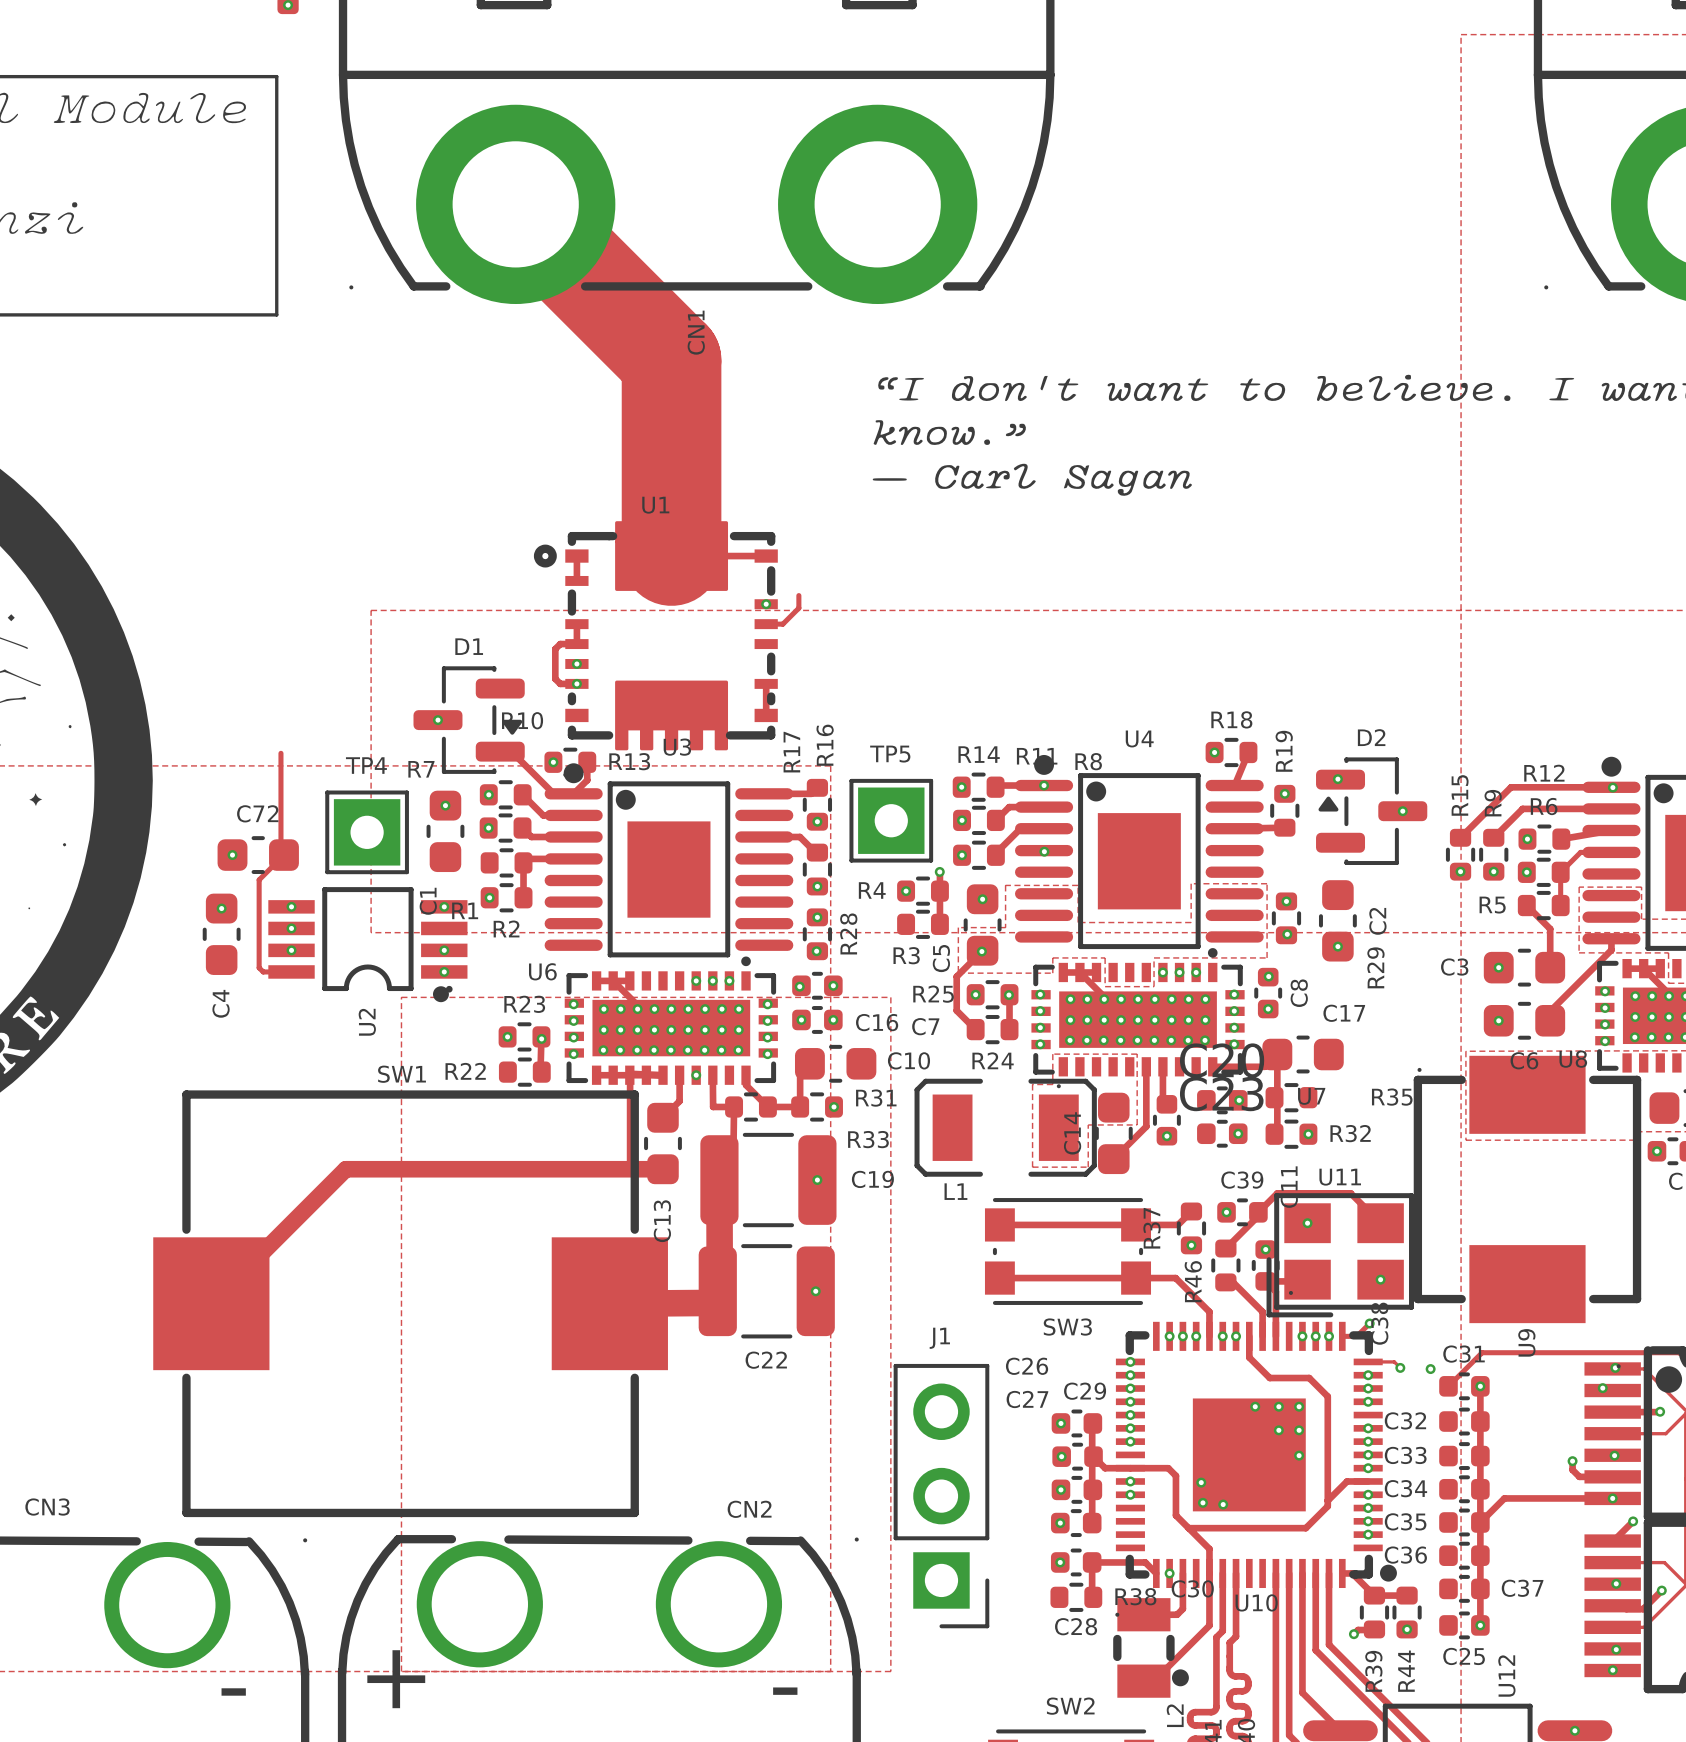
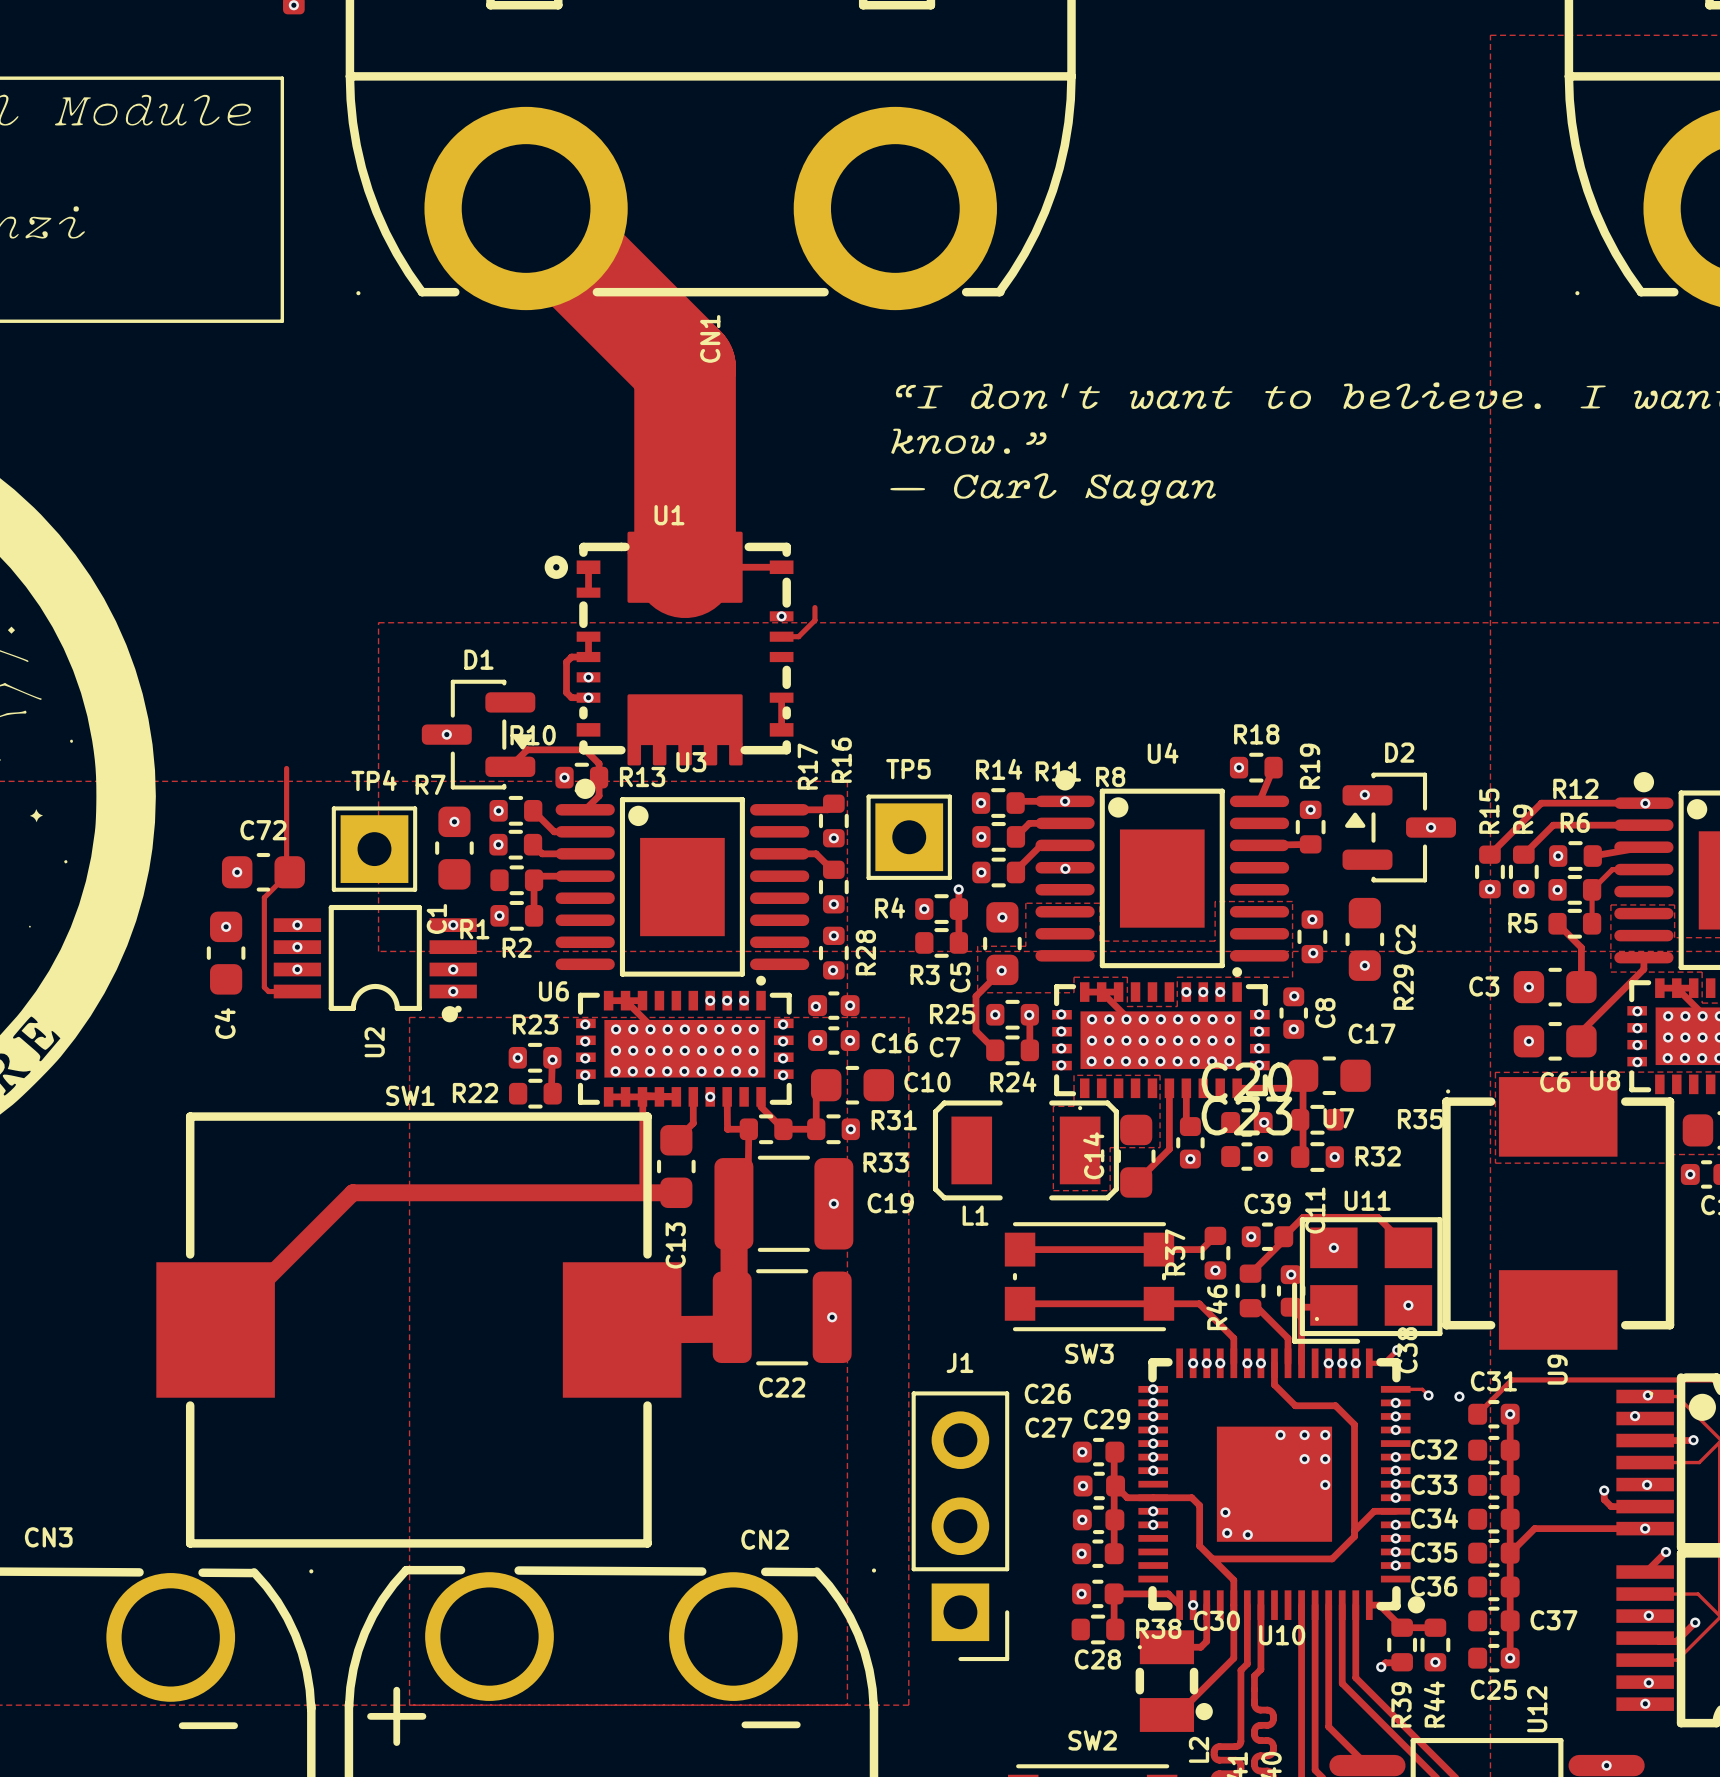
track: (500, 751) (511, 751) (553, 793) (573, 793) -> (510, 766) (527, 749) (585, 749) (599, 763) (599, 777)

